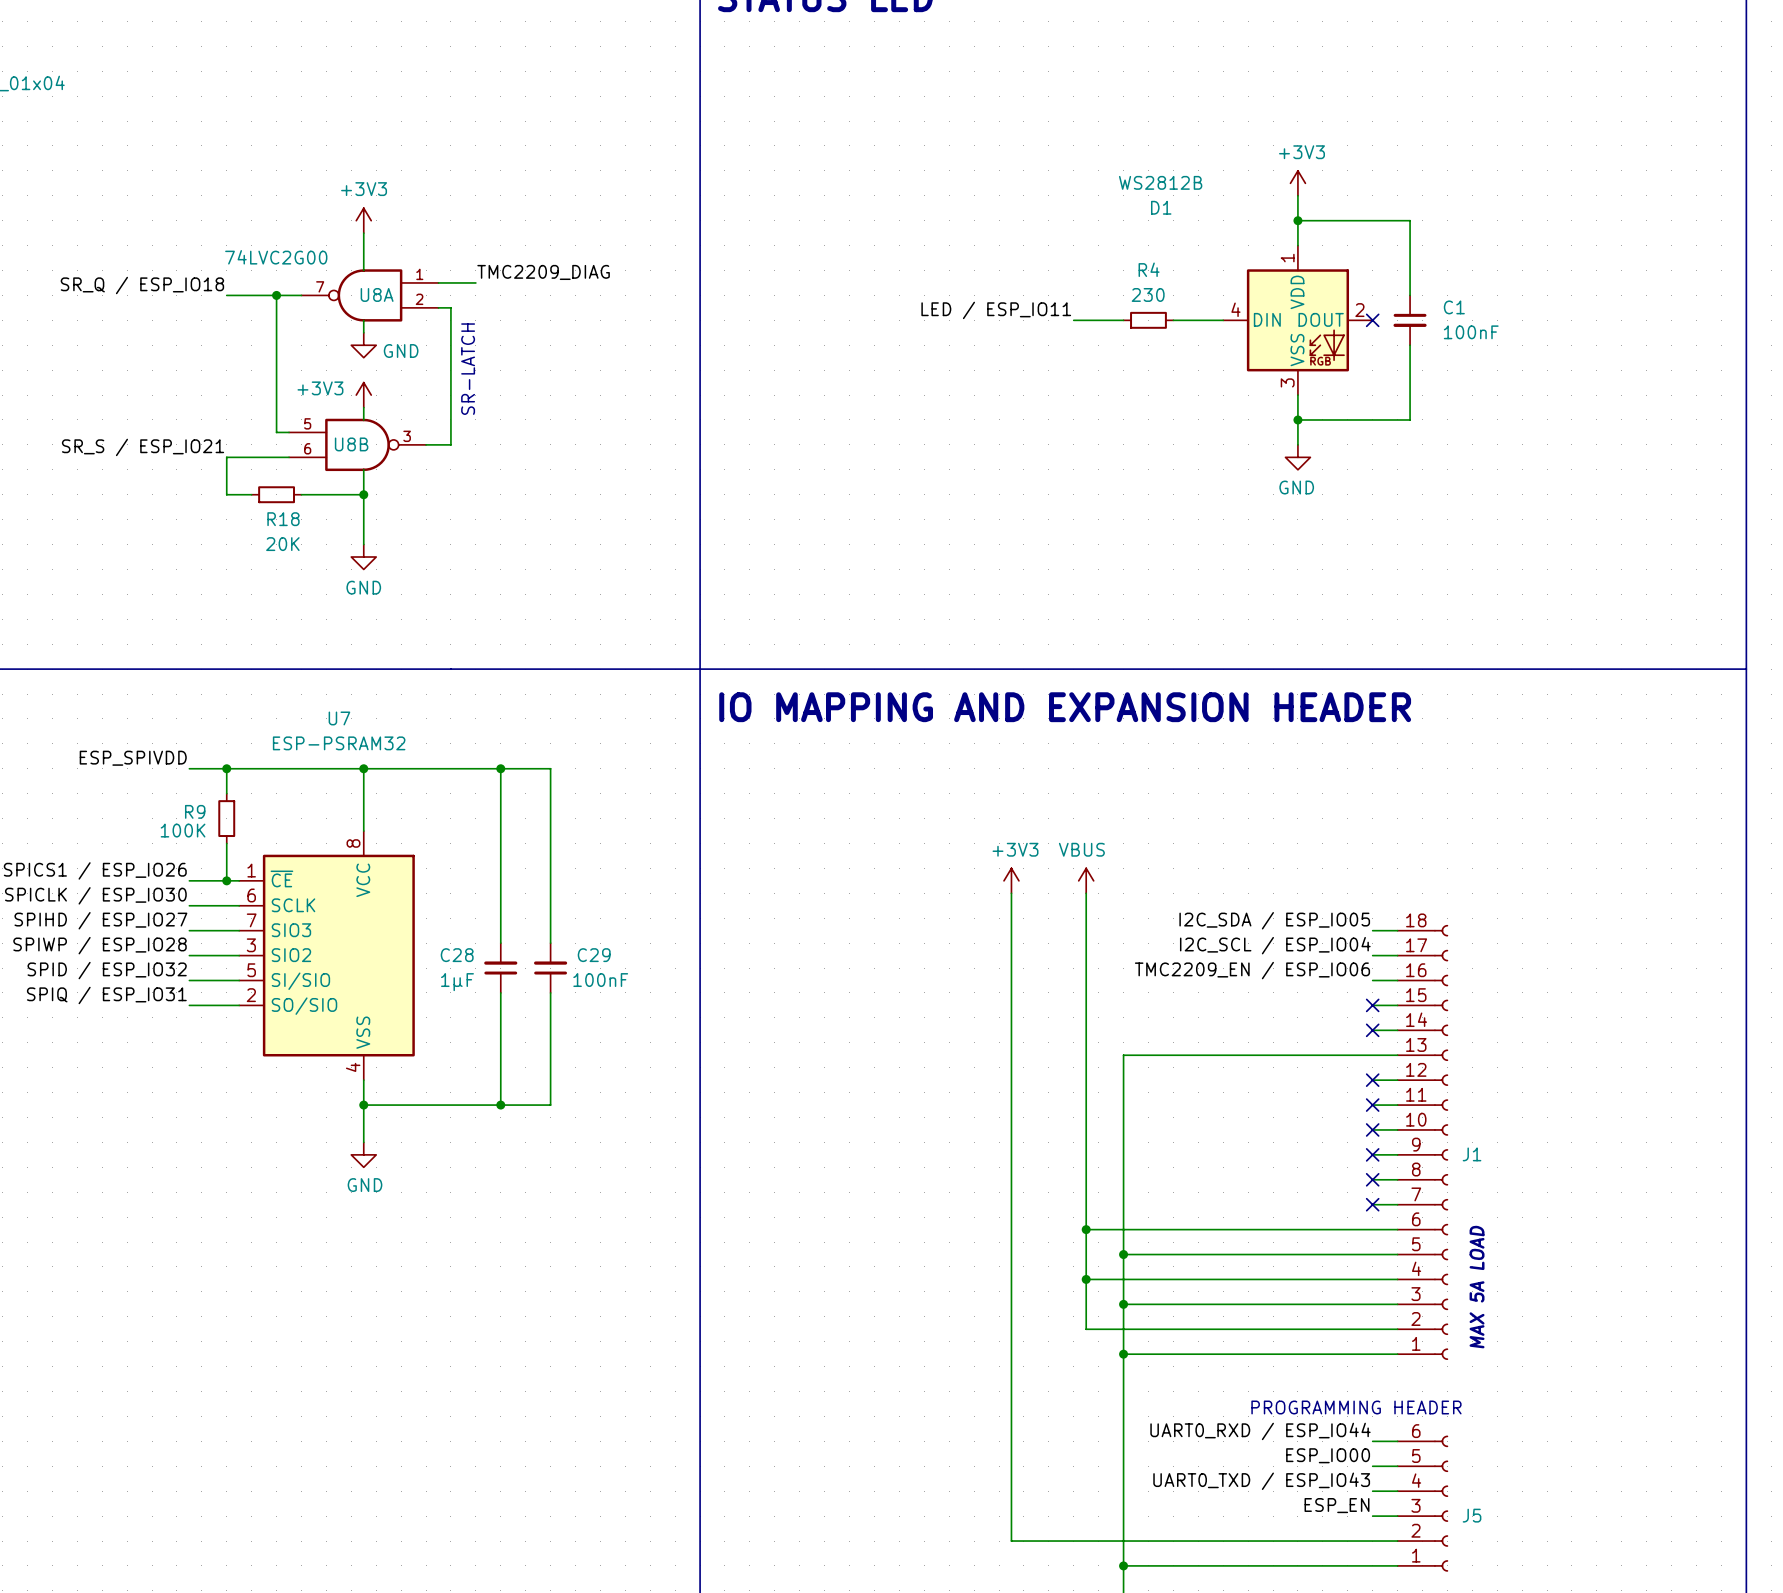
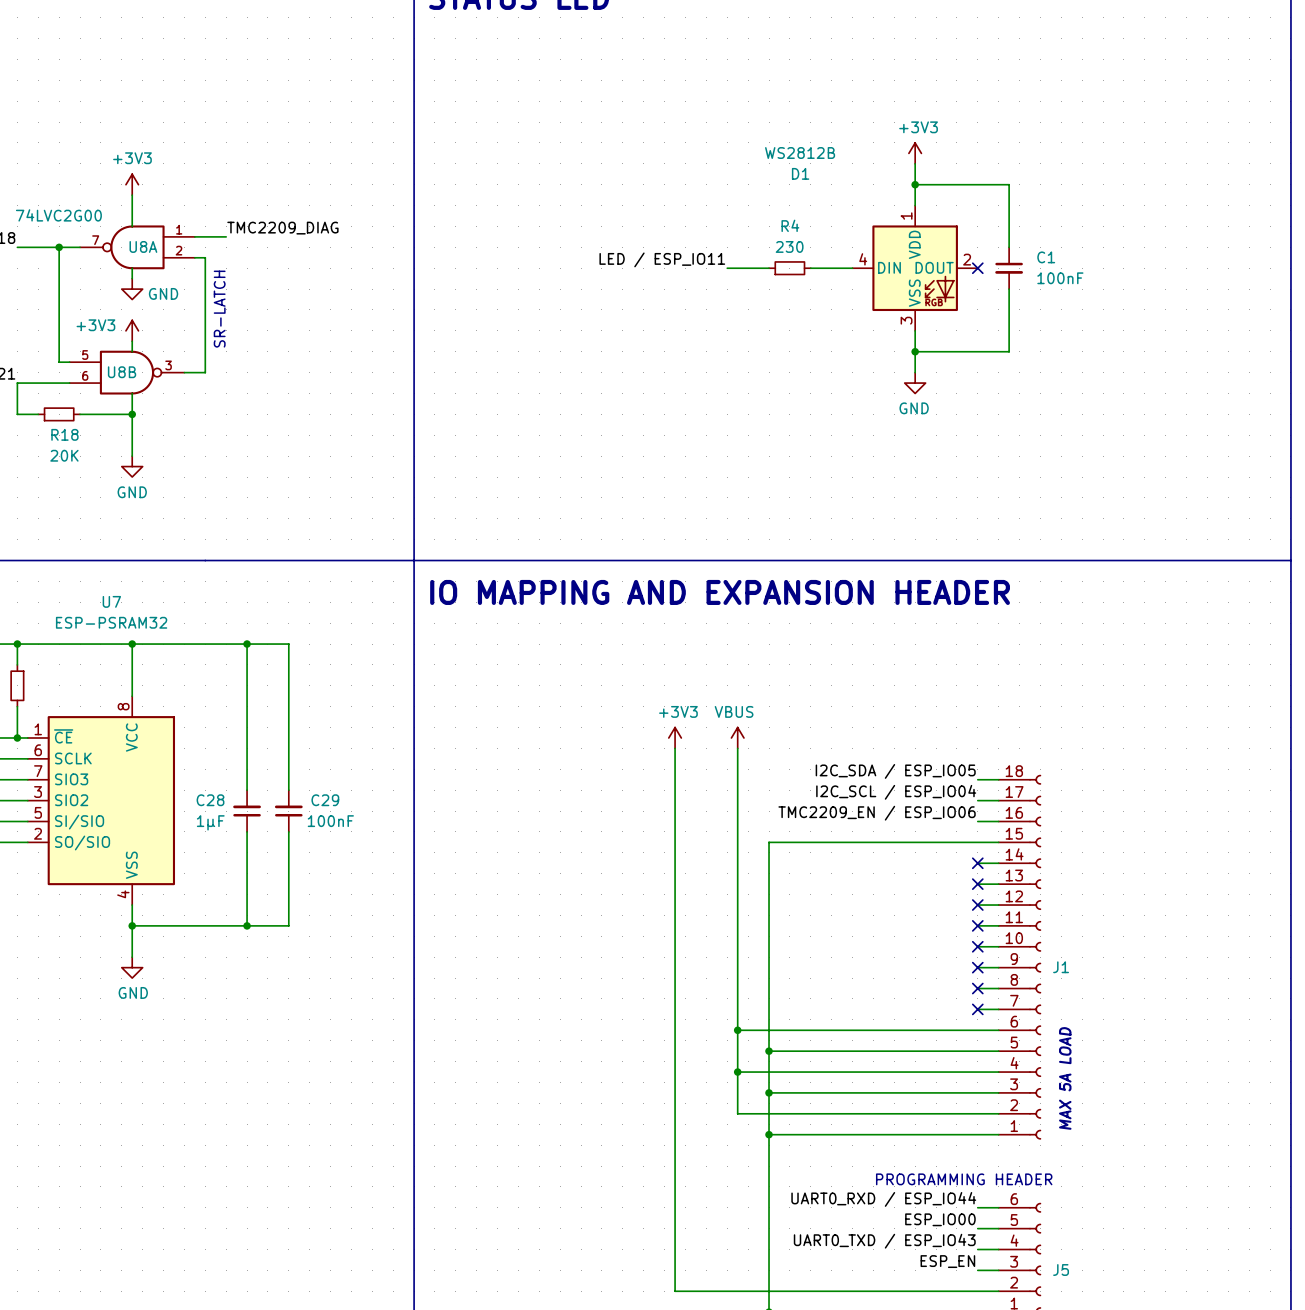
no-connect mark position: (1372, 1005) -> (977, 884)
wire: (1123, 1055) (1372, 1055) -> (769, 884) (769, 842) (977, 842)

